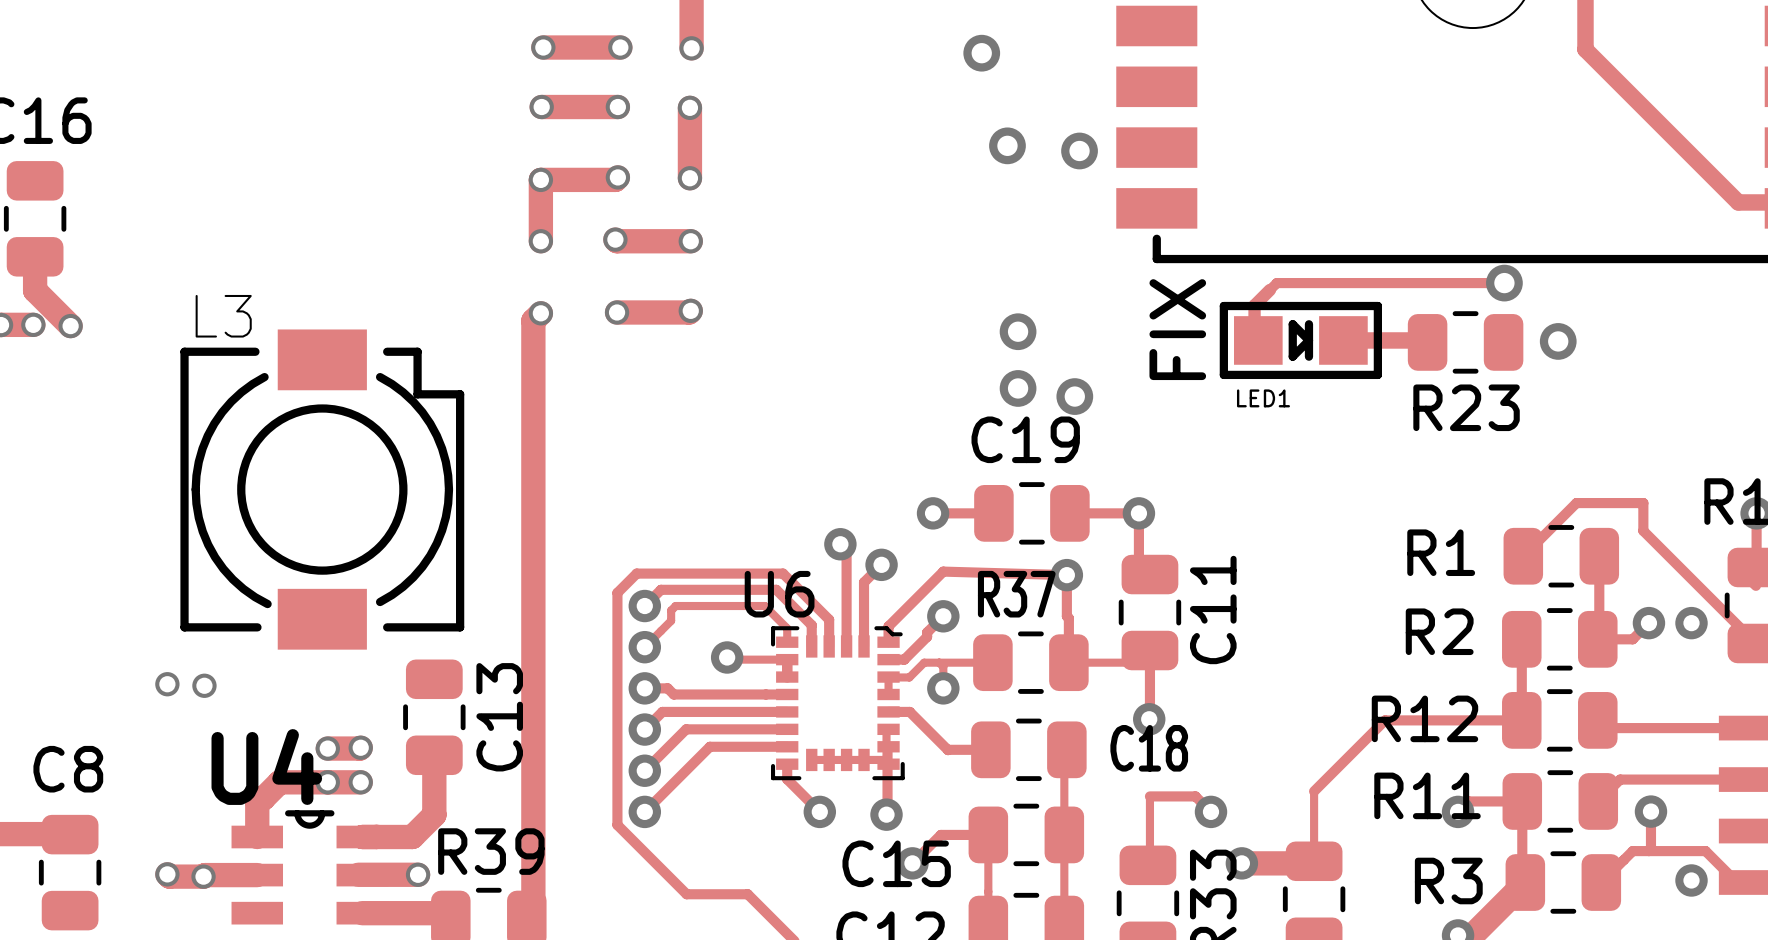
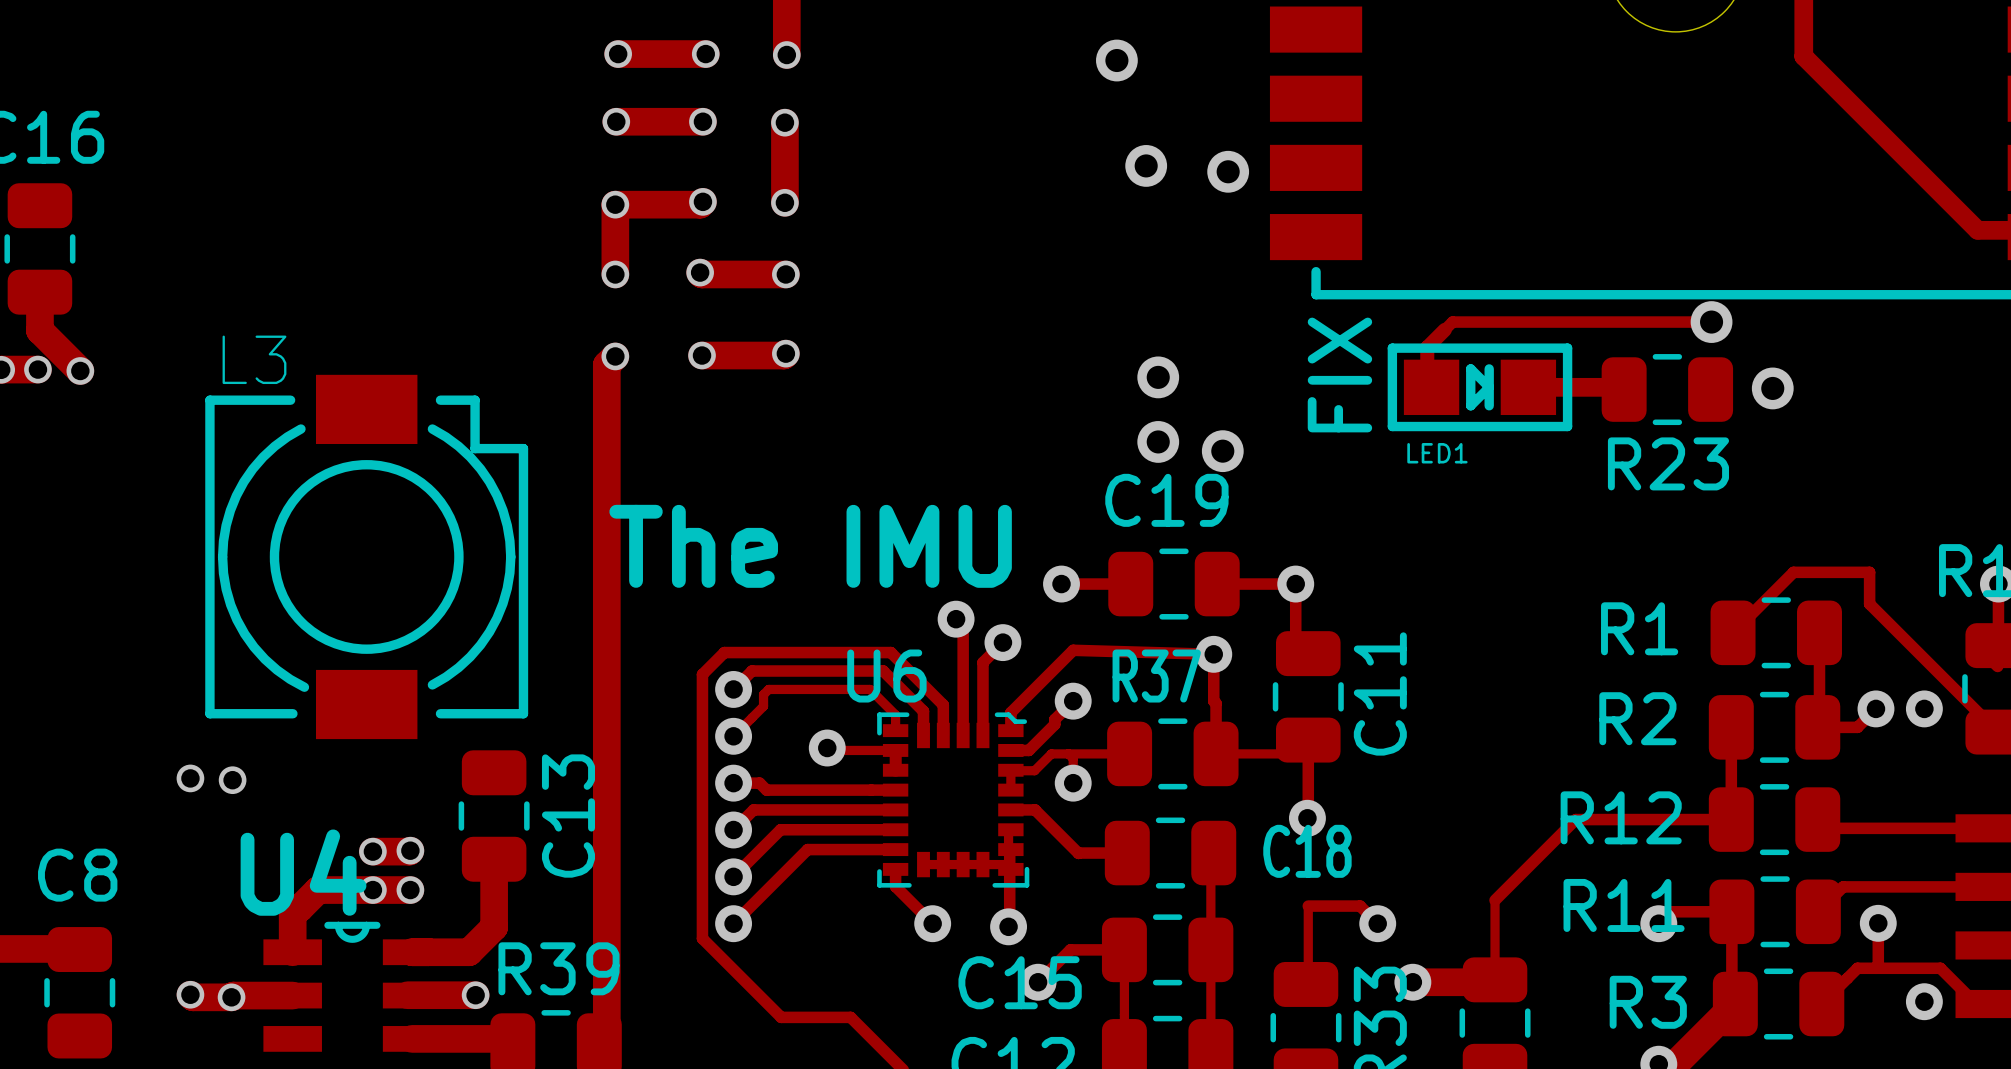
text: none -> The IMU (810, 546)

